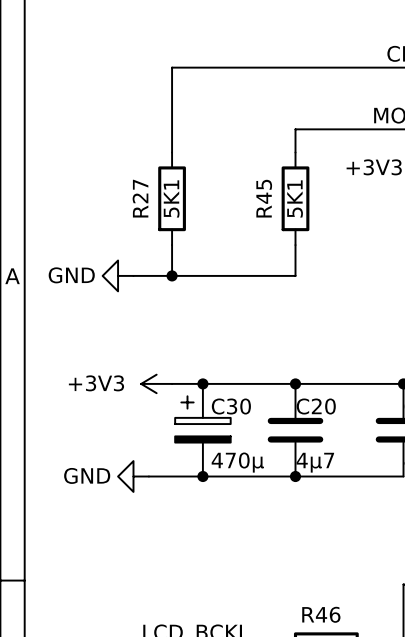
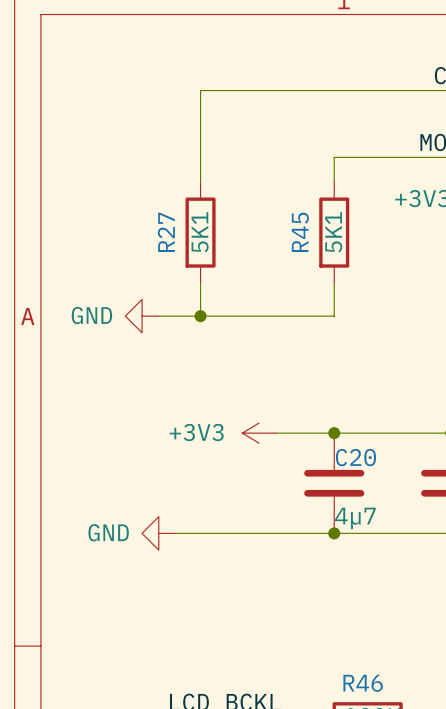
power symbol position: +3V3 (156, 383) -> +3V3 (259, 433)
junction: (202, 383) -> none
C30: 470µ (202, 430) -> none
junction: (202, 476) -> none

